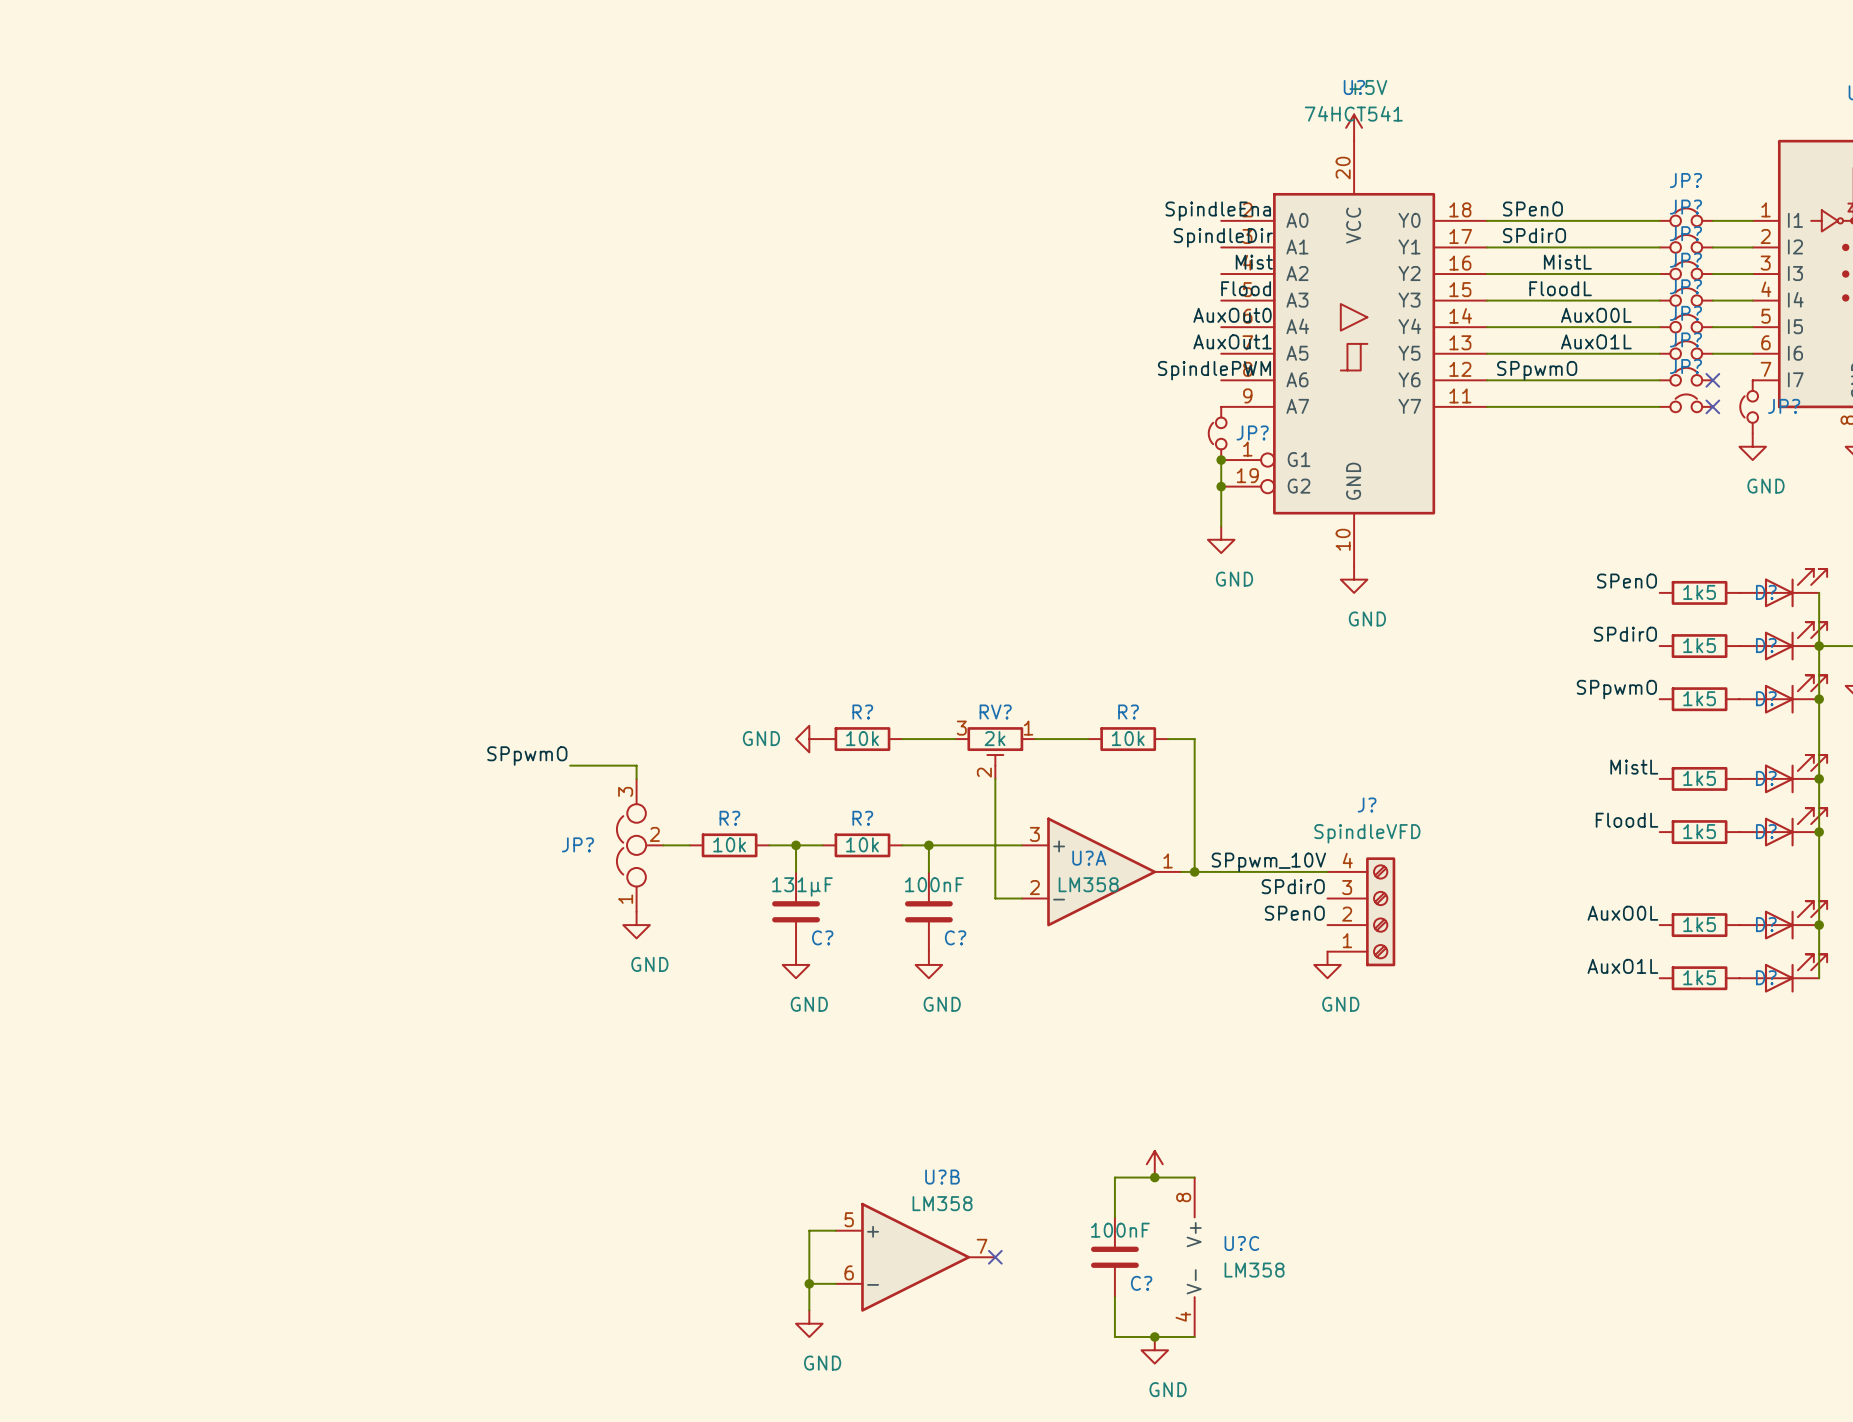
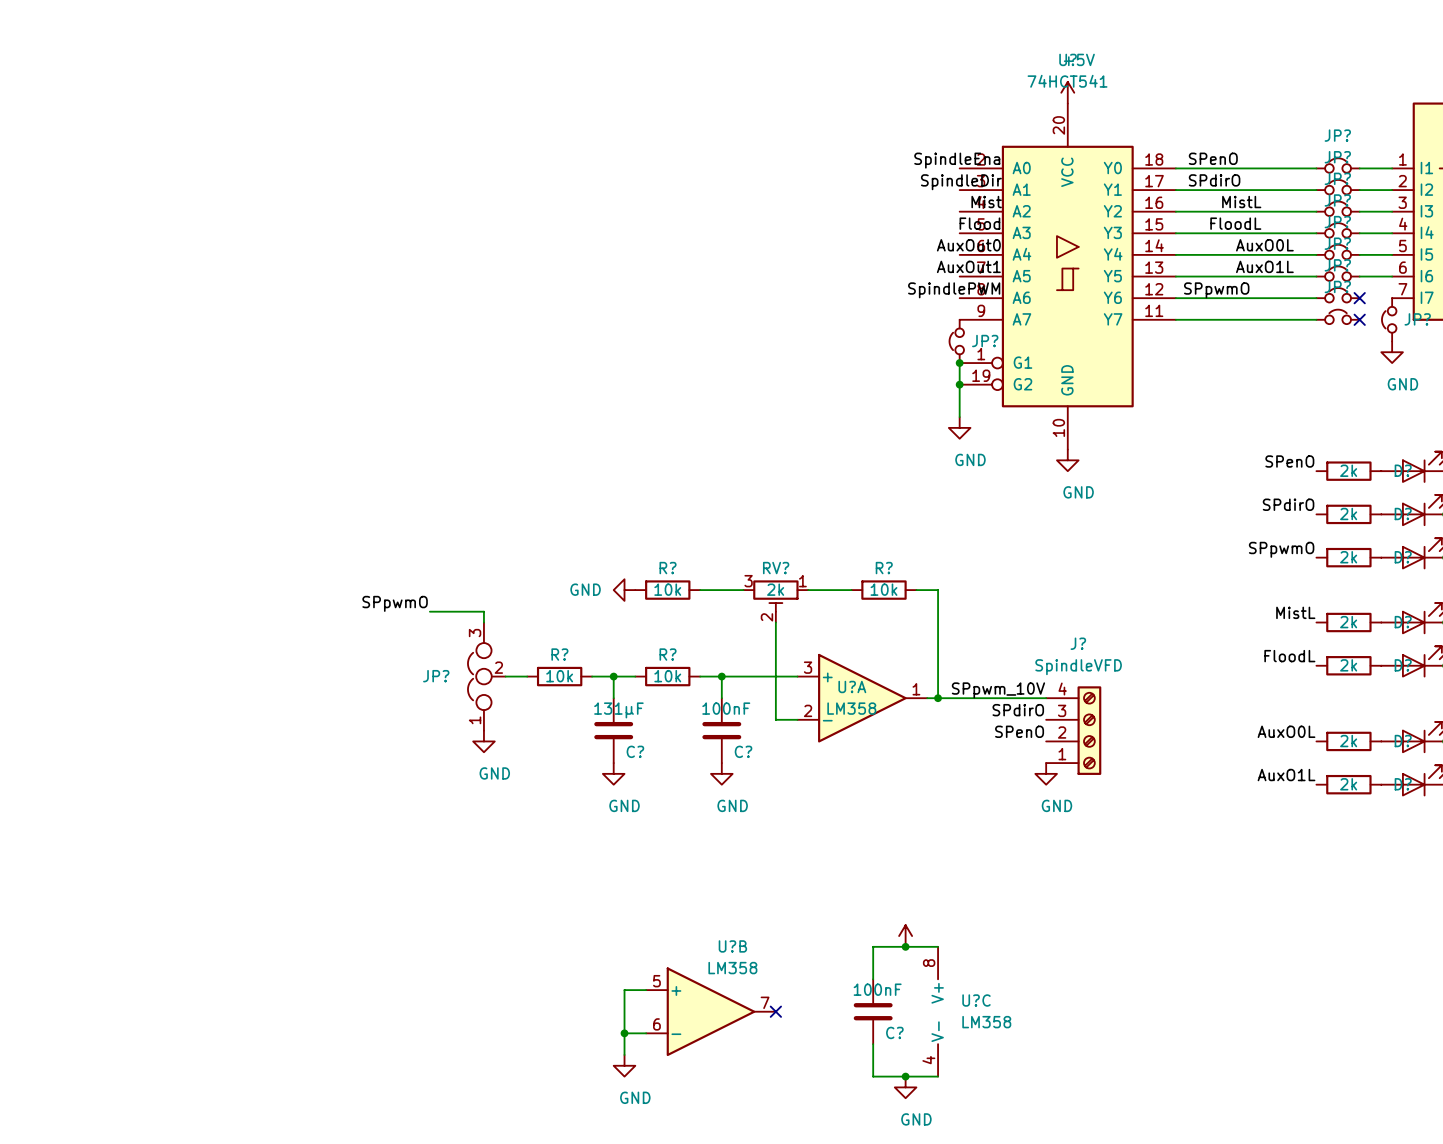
part value: 1k5 (1699, 592) -> 2k (1348, 470)
part value: 1k5 (1699, 645) -> 2k (1348, 513)
part value: 1k5 (1699, 698) -> 2k (1348, 557)
part value: 1k5 (1699, 778) -> 2k (1348, 622)
part value: 1k5 (1699, 831) -> 2k (1348, 665)
part value: 1k5 (1699, 924) -> 2k (1348, 741)
part value: 1k5 (1699, 977) -> 2k (1348, 784)

